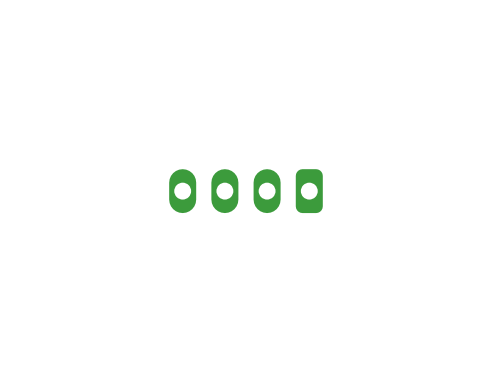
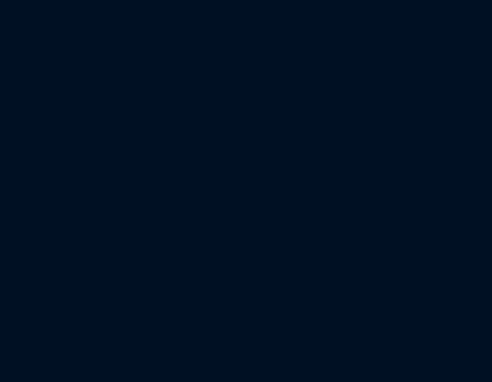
part: (245, 191) -> none

